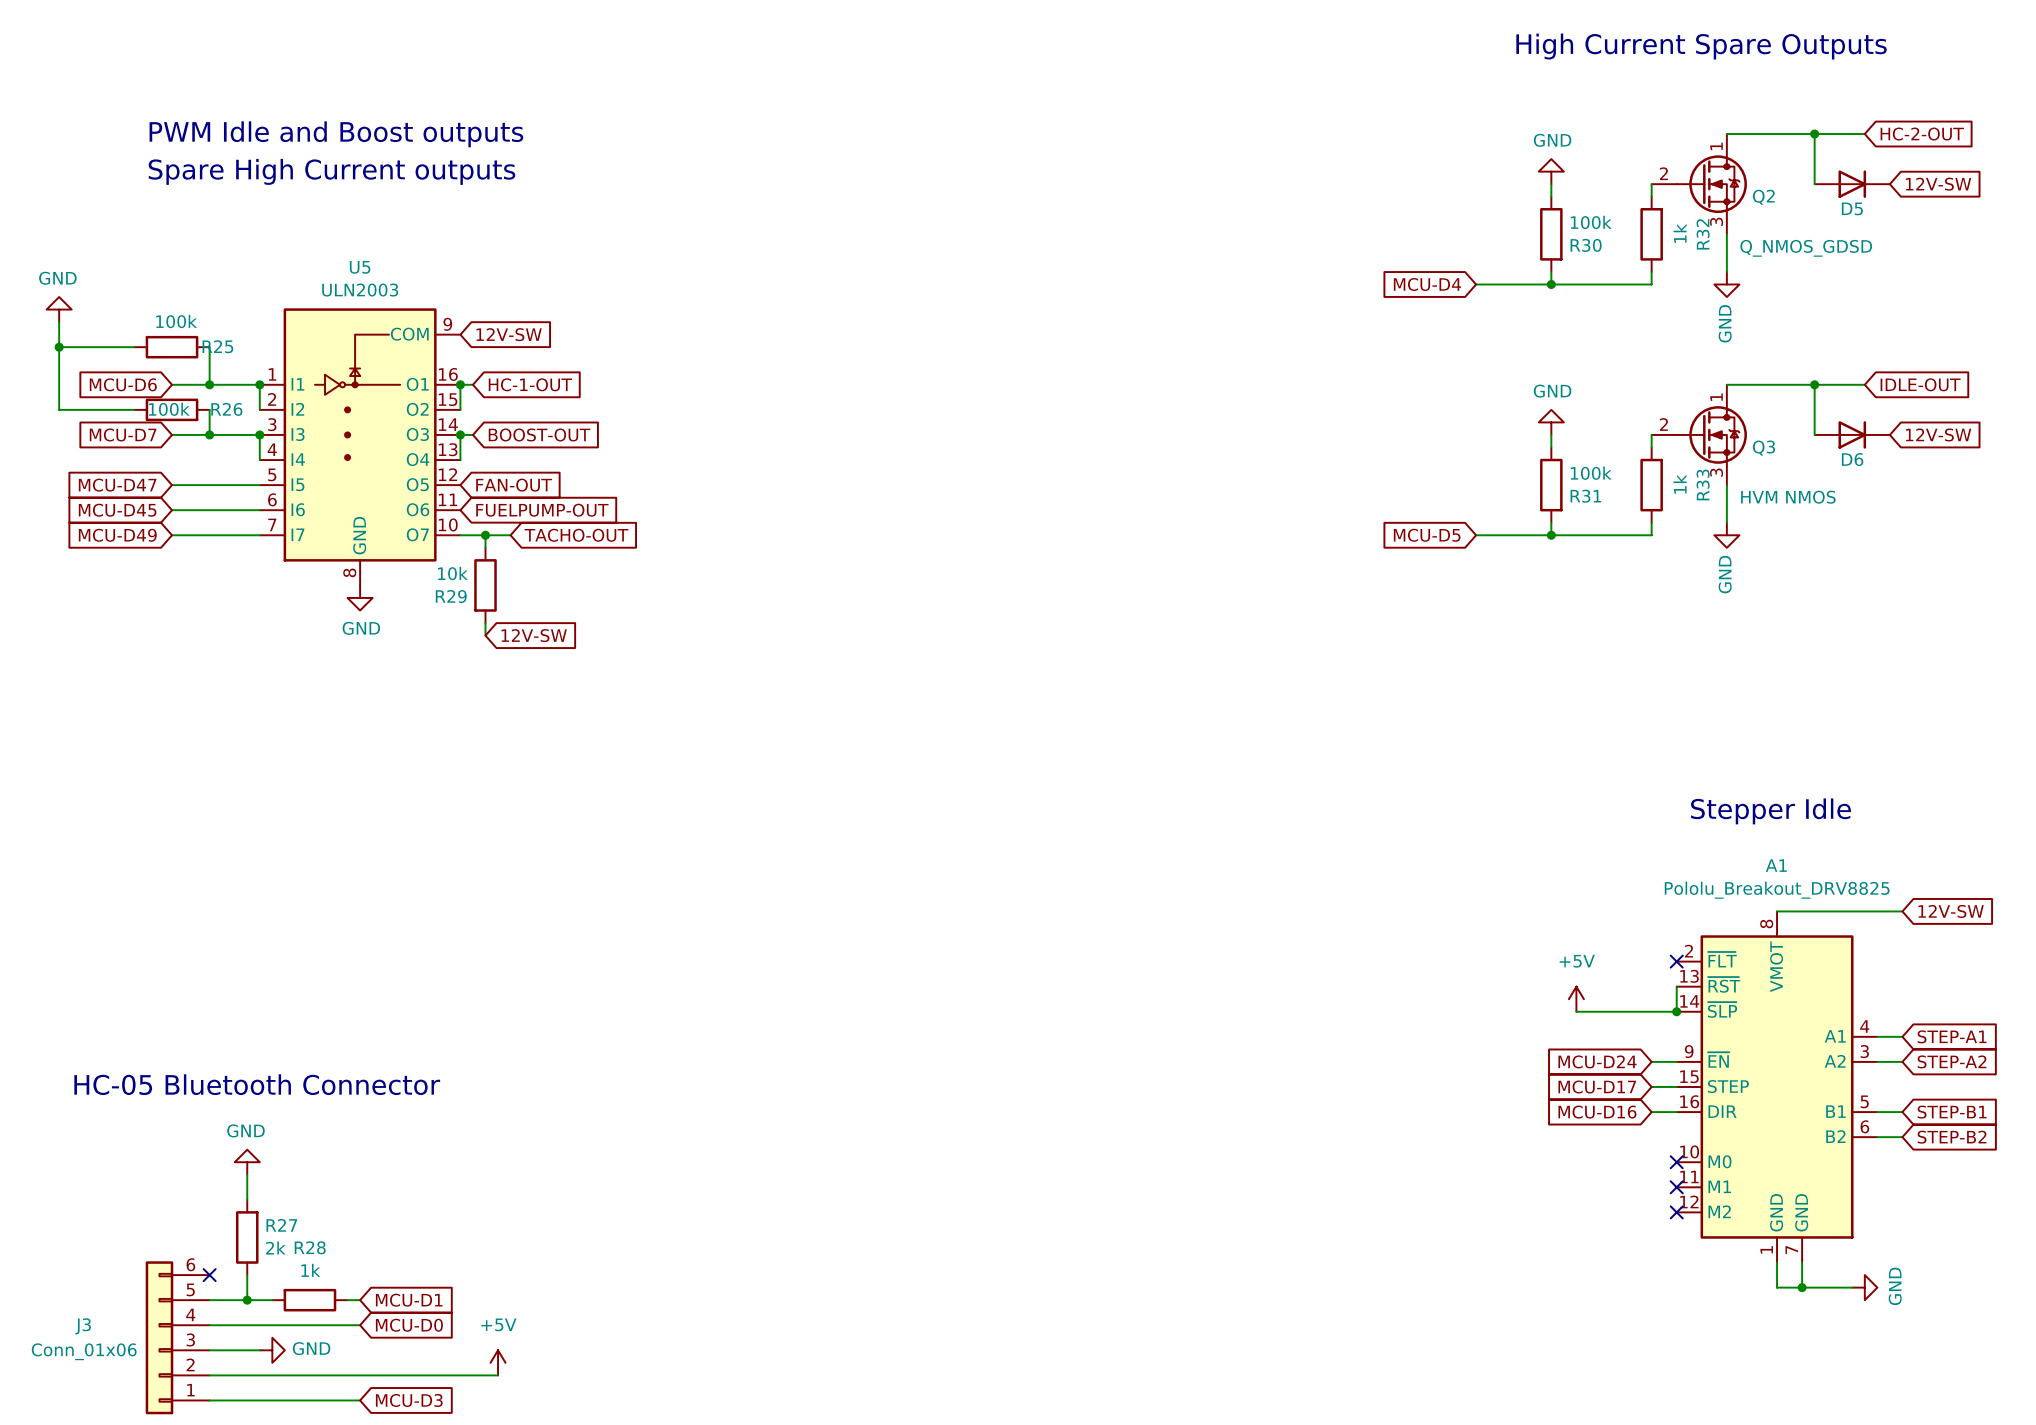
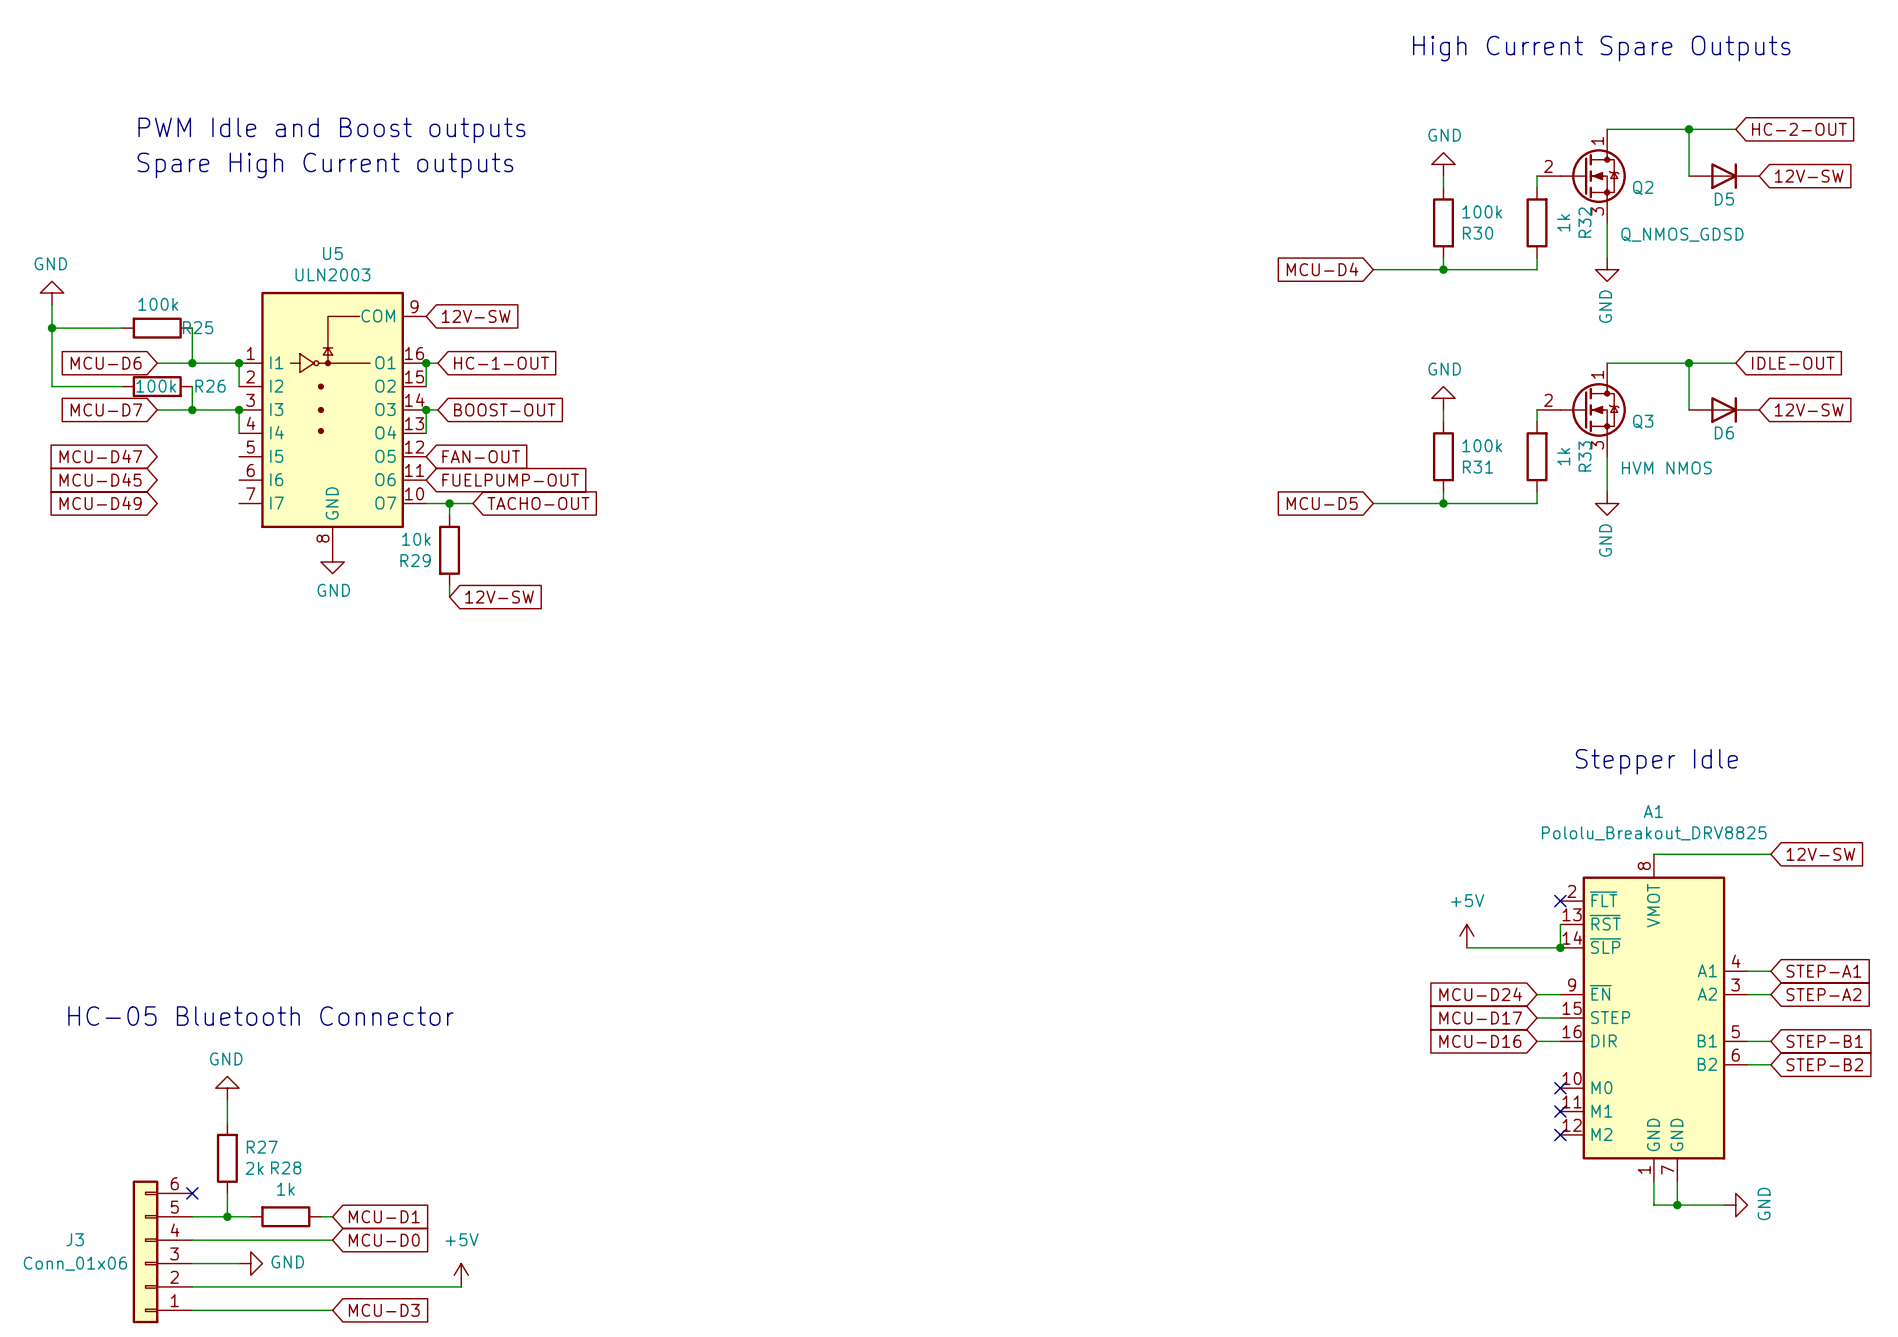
wire: (172, 485) (259, 485) -> none
wire: (172, 510) (259, 510) -> none
wire: (172, 535) (259, 535) -> none

